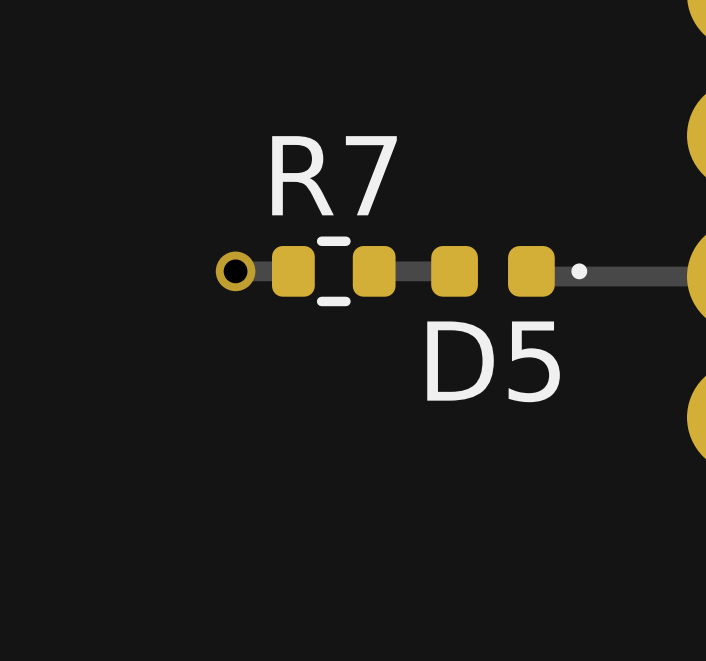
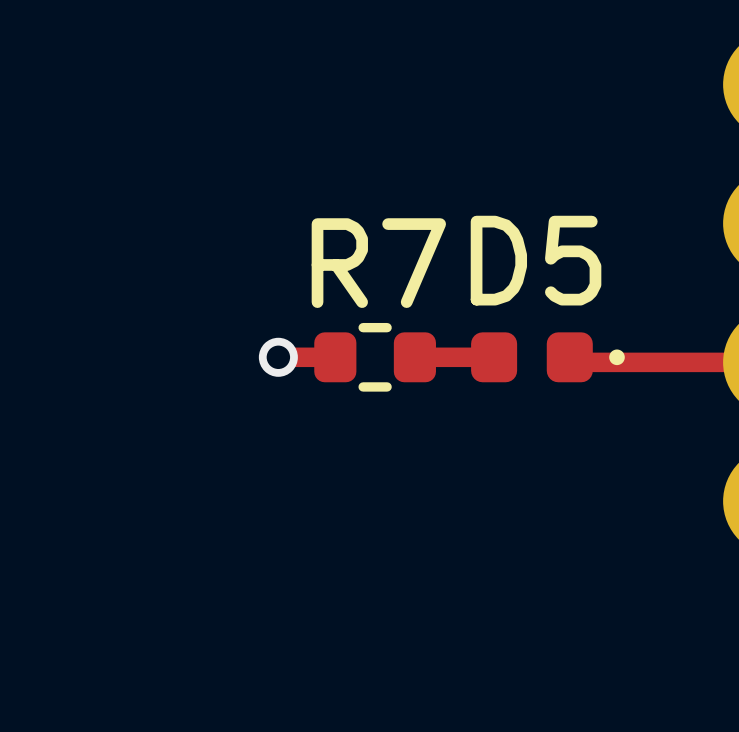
D5 name position: D5 (493, 361) -> D5 (536, 260)

